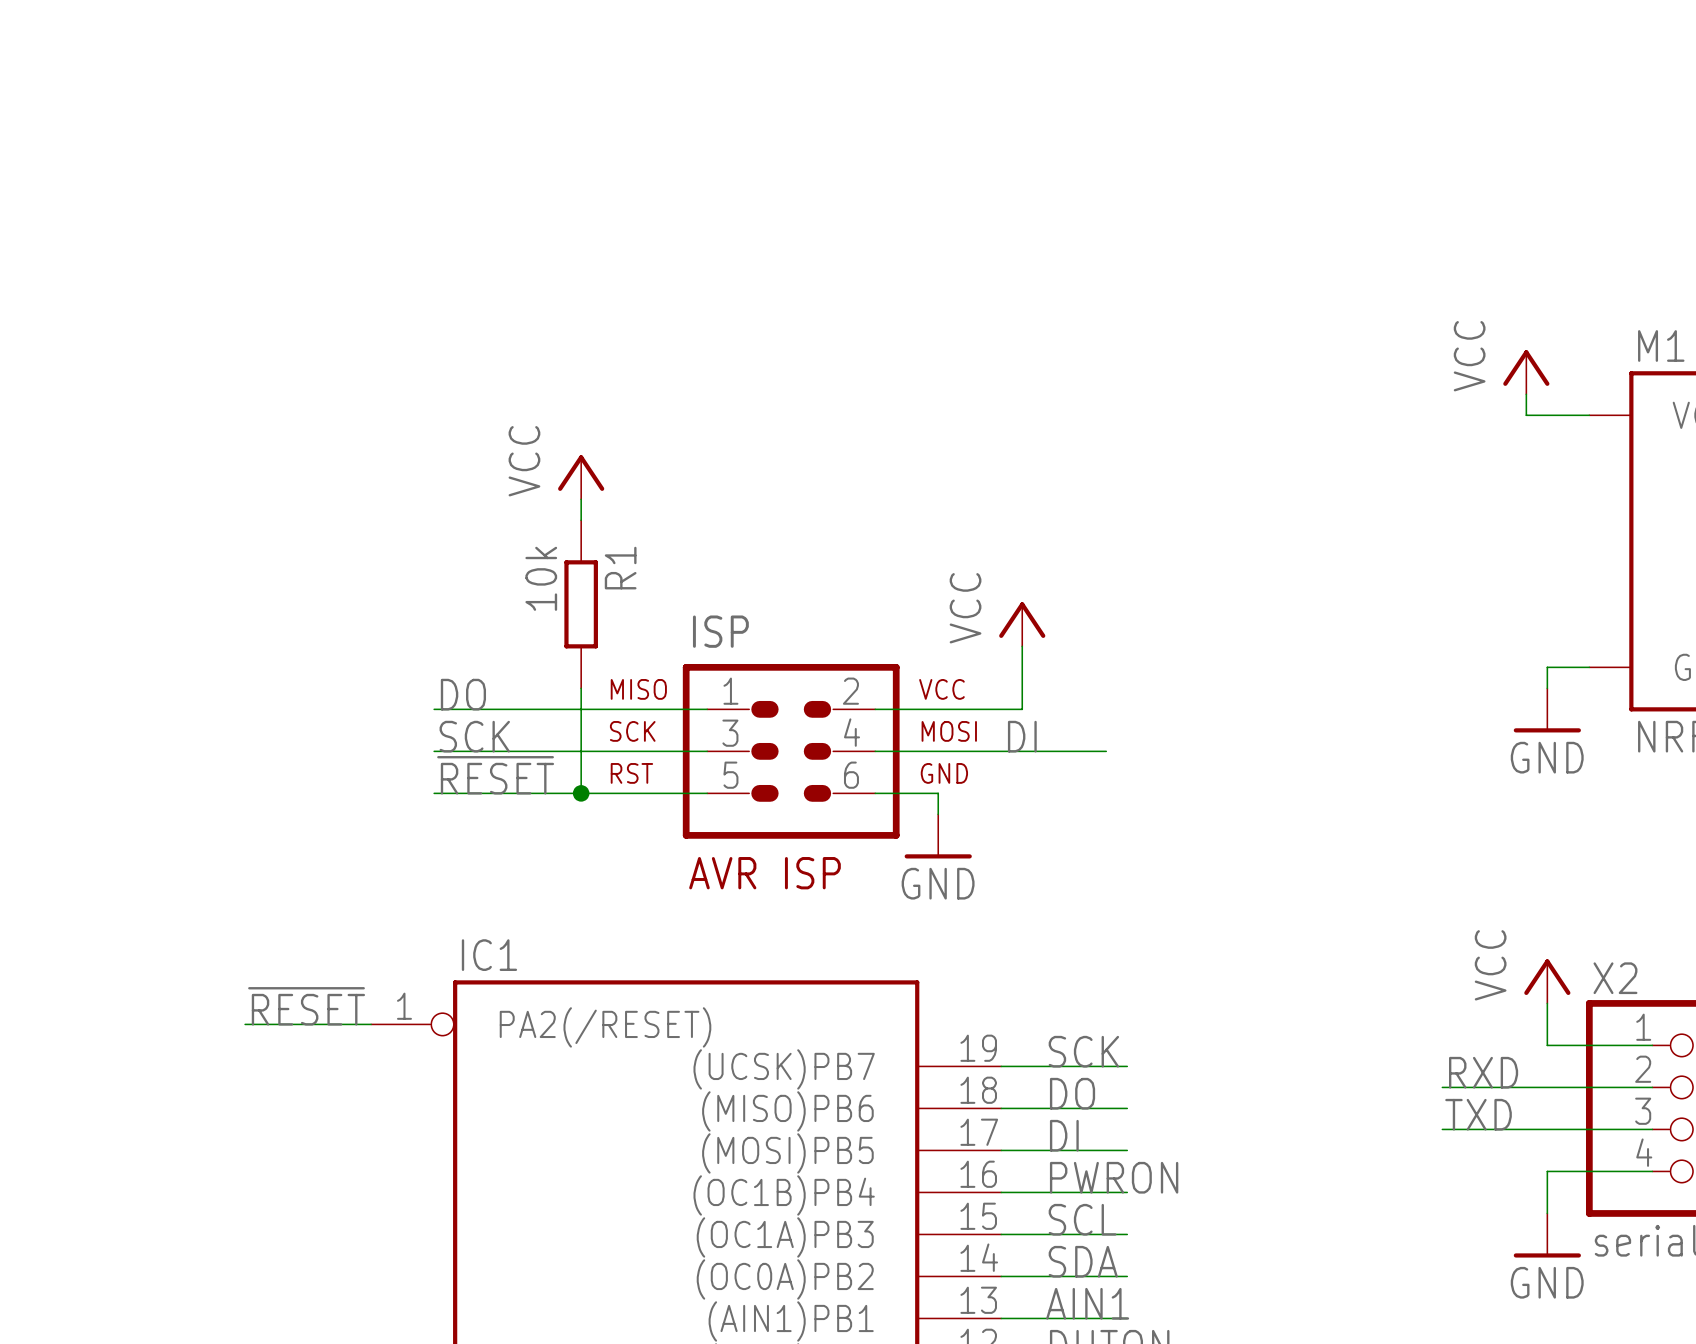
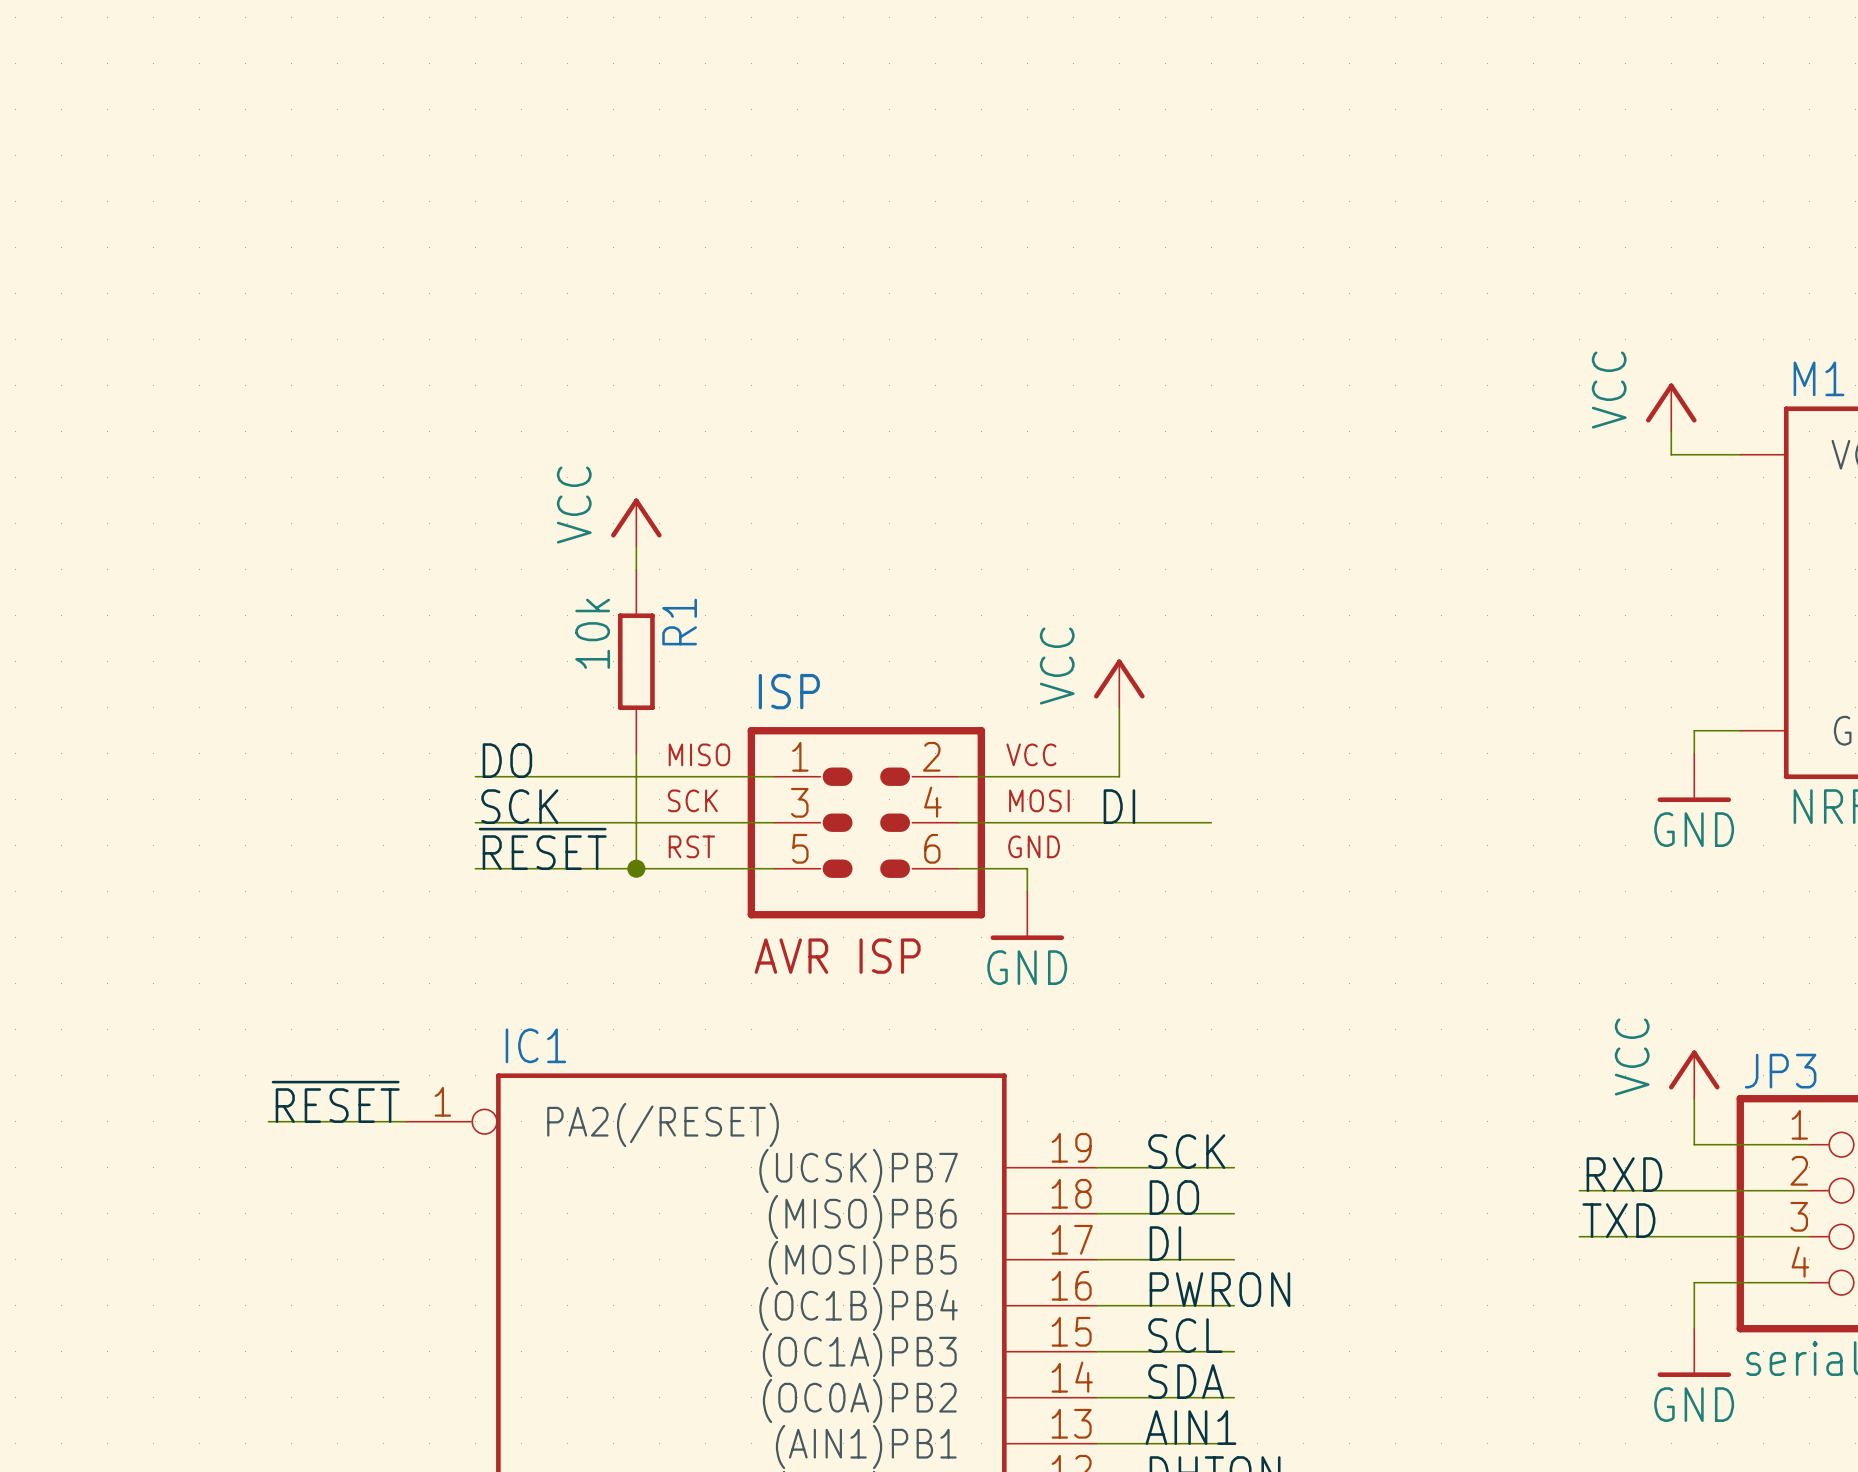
X2 name: X2 (1615, 978) -> JP3 (1780, 1071)

